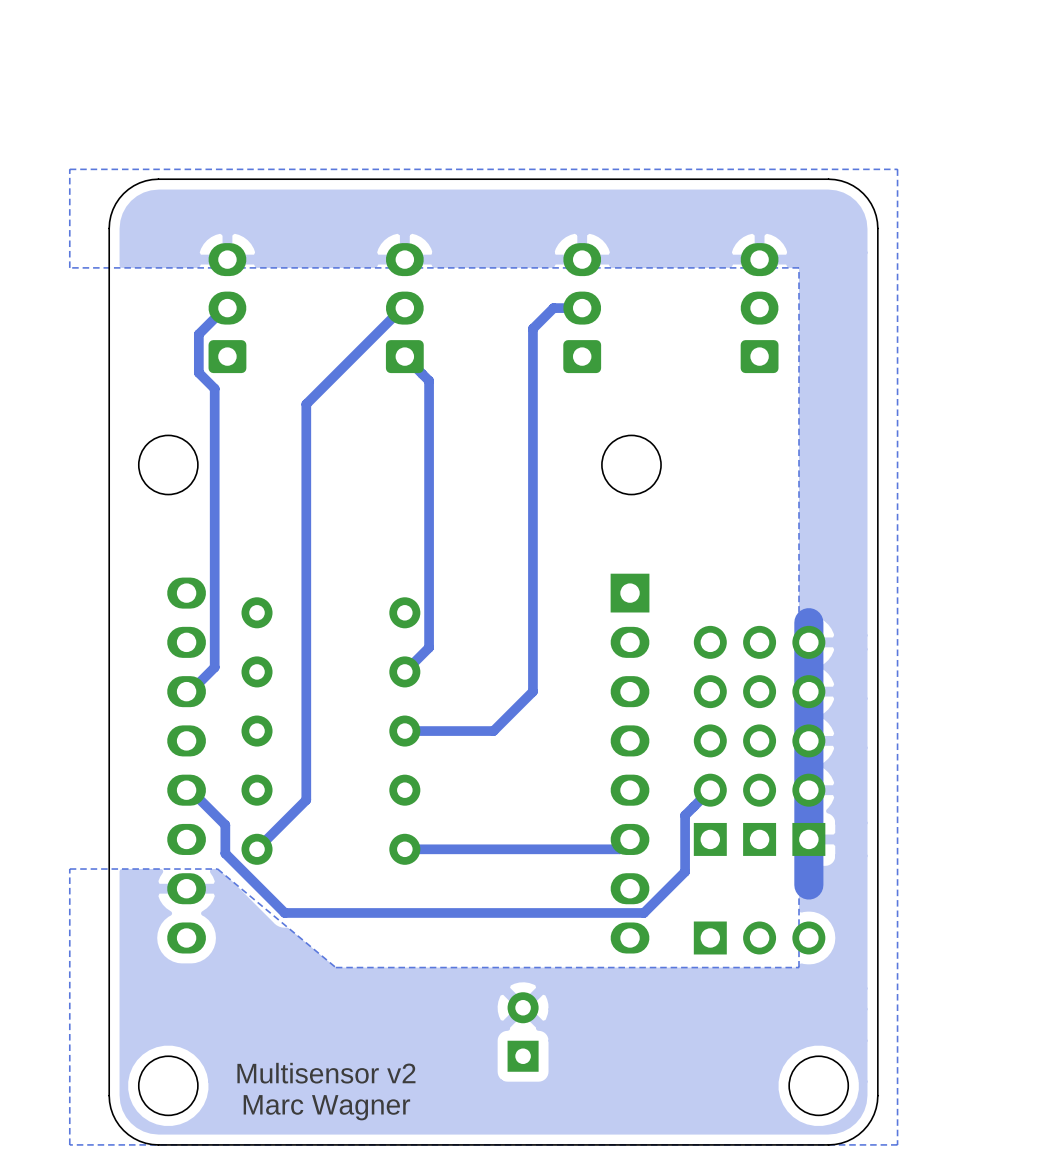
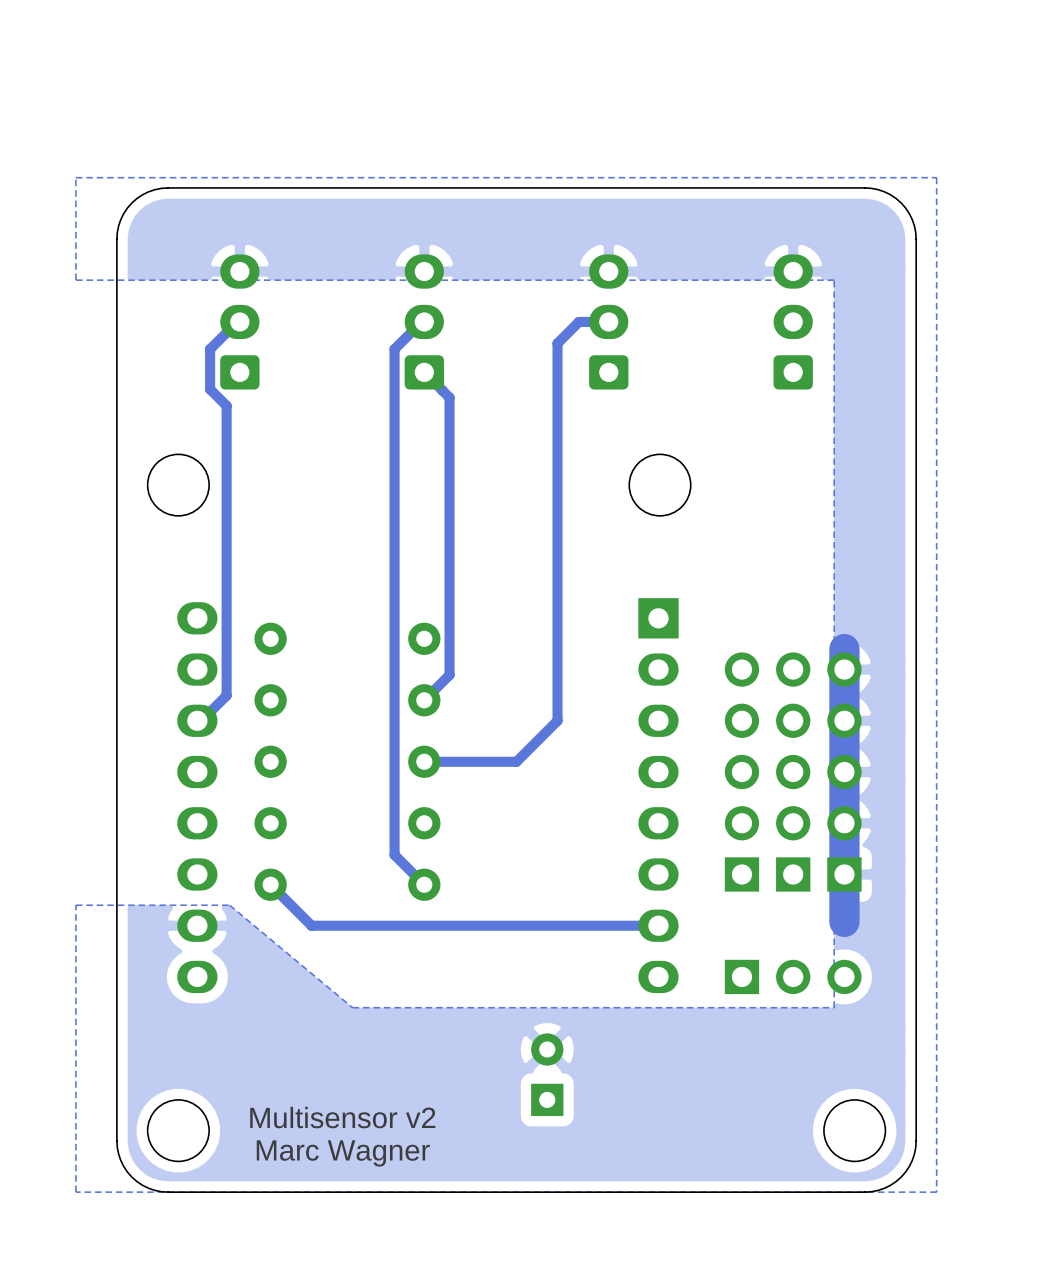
track: (376, 334) (306, 404) (306, 800) (257, 849) -> (394, 349) (394, 854) (424, 884)
track: (710, 790) (685, 815) (685, 871) (643, 912) (284, 912) (225, 853) (225, 825) (190, 790) (186, 790) -> none
track: (626, 839) (630, 839) (620, 849) (404, 849) -> none
track: none -> (270, 884) (311, 925) (658, 925)

